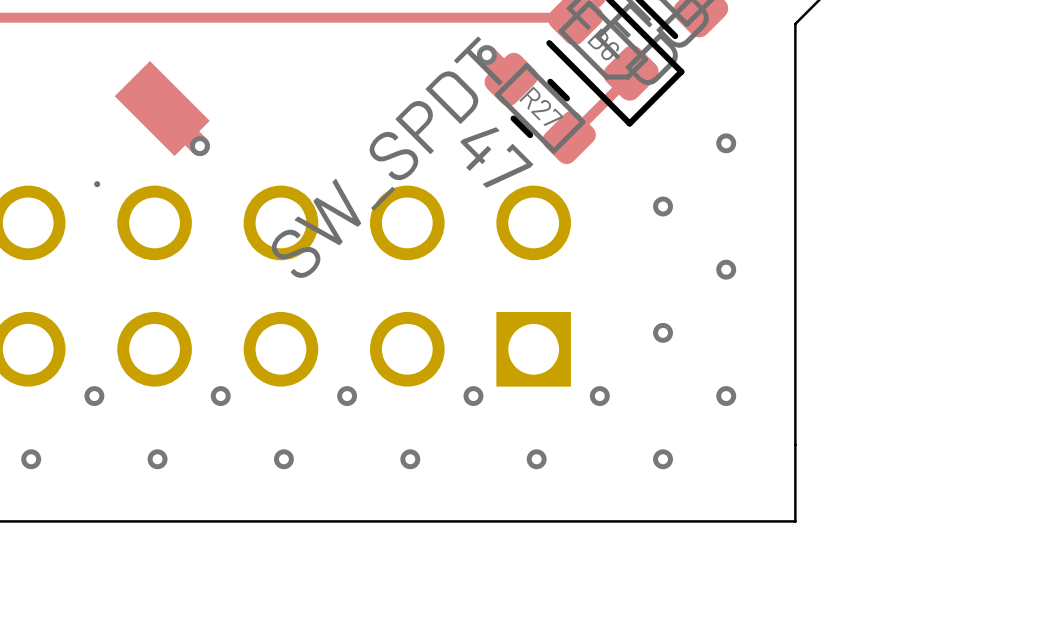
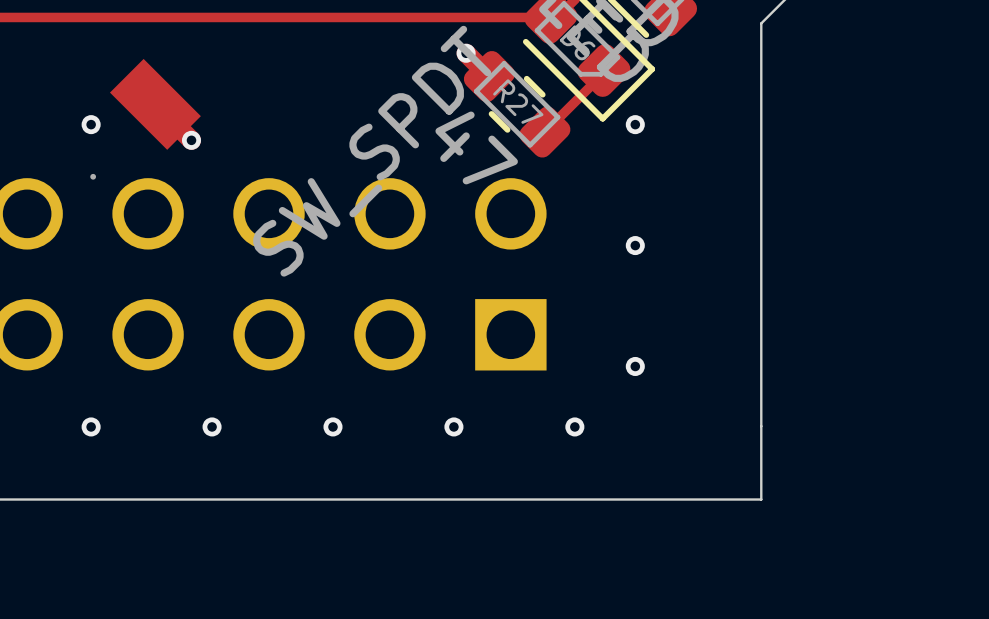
via: none -> (91, 124)
via: none -> (635, 124)
via: (726, 143) -> none
via: (663, 206) -> none
via: none -> (635, 245)
via: (726, 269) -> none
via: (663, 332) -> none
via: none -> (635, 366)
via: (94, 396) -> none
via: (220, 396) -> none
via: (347, 396) -> none
via: (473, 396) -> none
via: (599, 396) -> none
via: (726, 396) -> none
via: none -> (91, 426)
via: none -> (212, 426)
via: none -> (332, 426)
via: none -> (453, 426)
via: none -> (574, 426)
via: (31, 459) -> none
via: (157, 459) -> none
via: (283, 459) -> none
via: (410, 459) -> none
via: (536, 459) -> none
via: (663, 459) -> none

